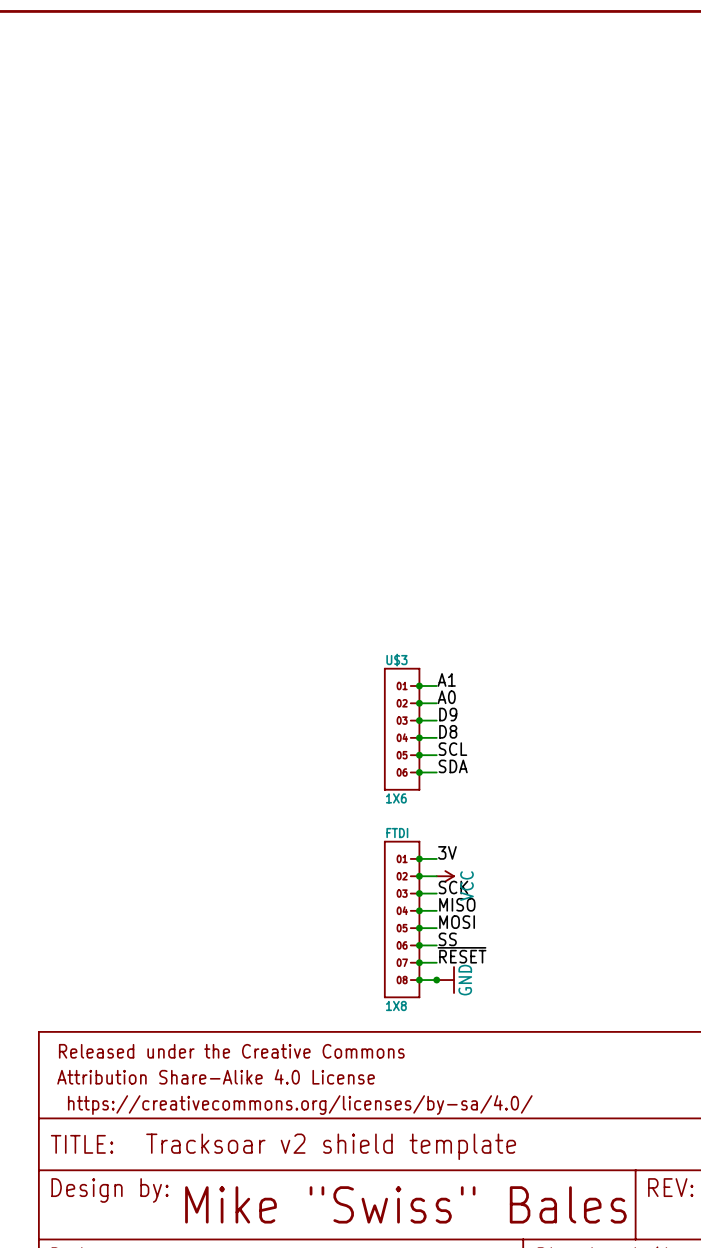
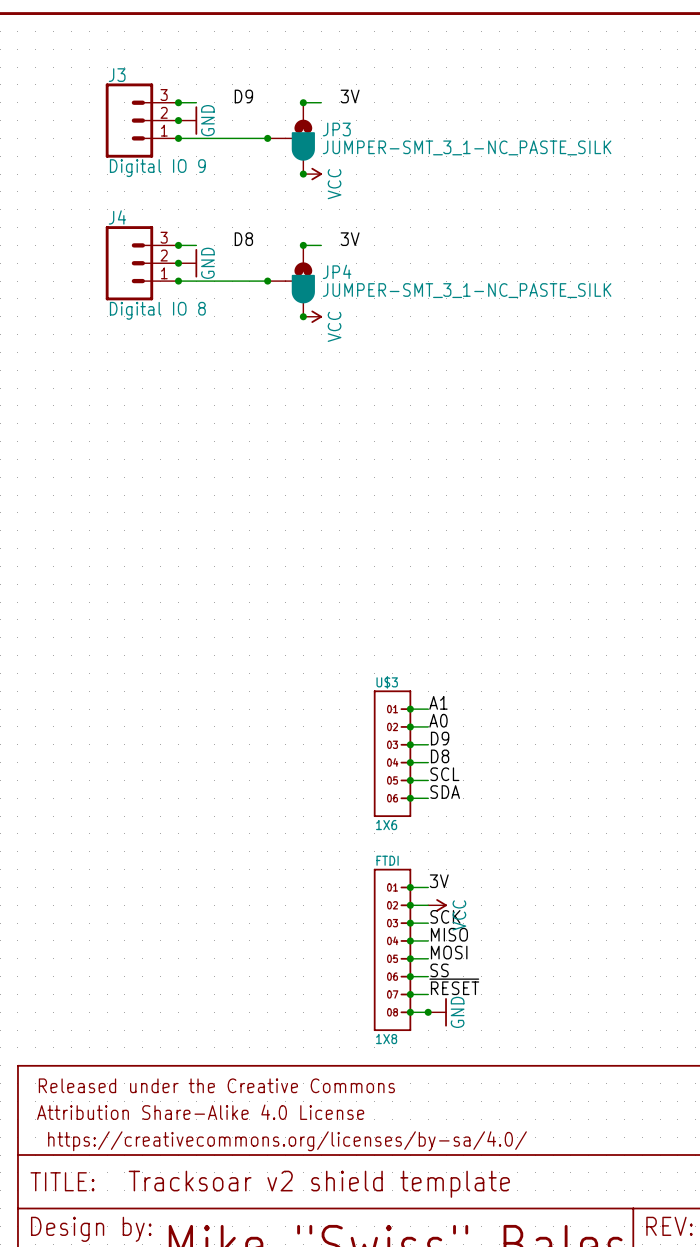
label: none -> D9 (243, 96)
label: none -> 3V (350, 96)
wire: none -> (178, 102) (196, 102)
junction: none -> (178, 102)
wire: none -> (303, 102) (321, 102)
junction: none -> (303, 102)
J3: none -> Digital IO 9 (142, 120)
junction: none -> (178, 120)
power symbol: none -> GND (187, 120)
wire: none -> (178, 138) (267, 138)
junction: none -> (178, 138)
junction: none -> (267, 138)
JP3: none -> JUMPER-SMT_3_1-NC_PASTE_SILK (291, 138)
junction: none -> (303, 174)
power symbol: none -> VCC (312, 174)
label: none -> D8 (243, 239)
label: none -> 3V (350, 239)
wire: none -> (178, 245) (196, 245)
junction: none -> (178, 245)
wire: none -> (303, 245) (321, 245)
junction: none -> (303, 245)
J4: none -> Digital IO 8 (142, 263)
junction: none -> (178, 263)
power symbol: none -> GND (187, 263)
wire: none -> (178, 281) (267, 281)
junction: none -> (178, 281)
junction: none -> (267, 281)
JP4: none -> JUMPER-SMT_3_1-NC_PASTE_SILK (291, 281)
junction: none -> (303, 316)
power symbol: none -> VCC (312, 316)

